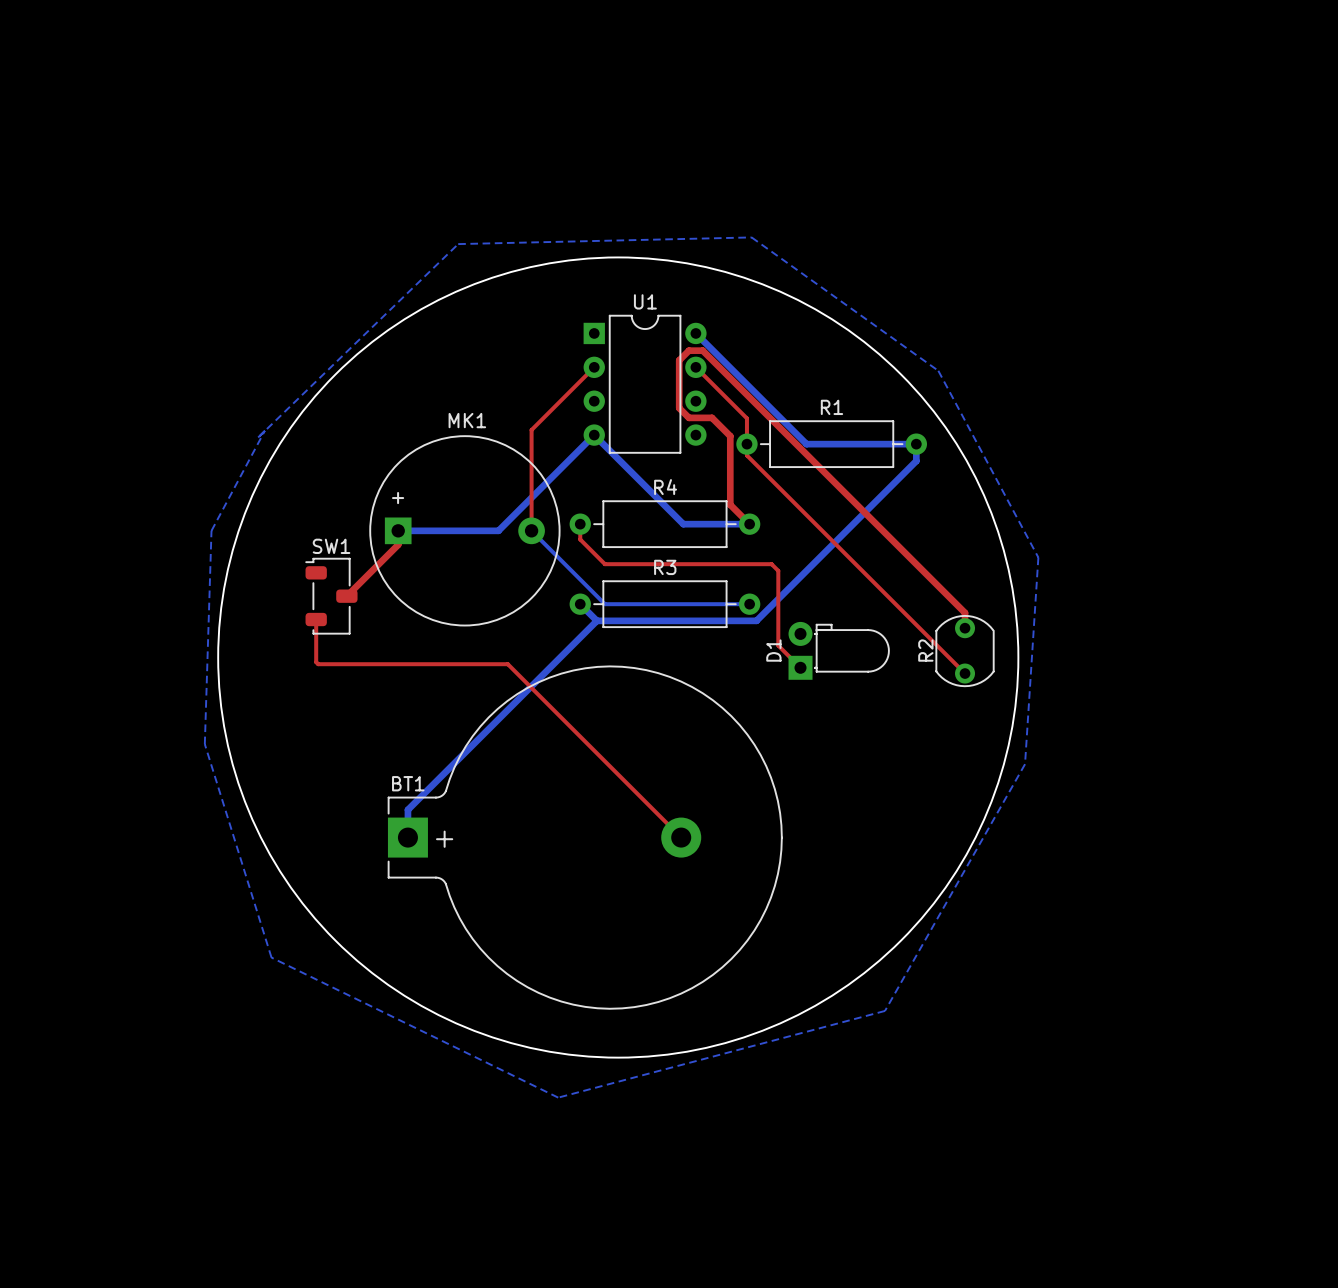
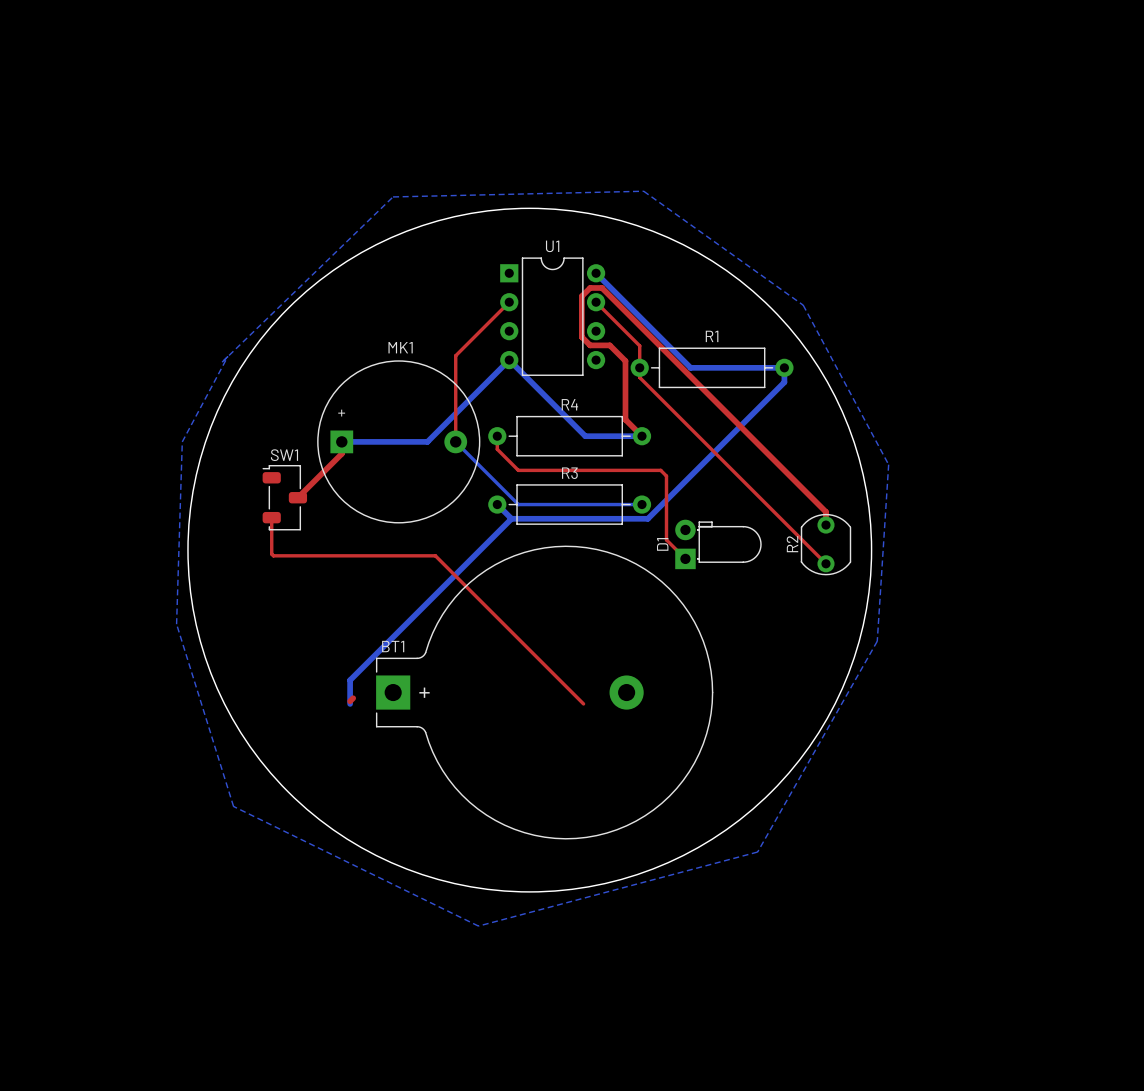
BT1 position: (585, 837) -> (544, 692)

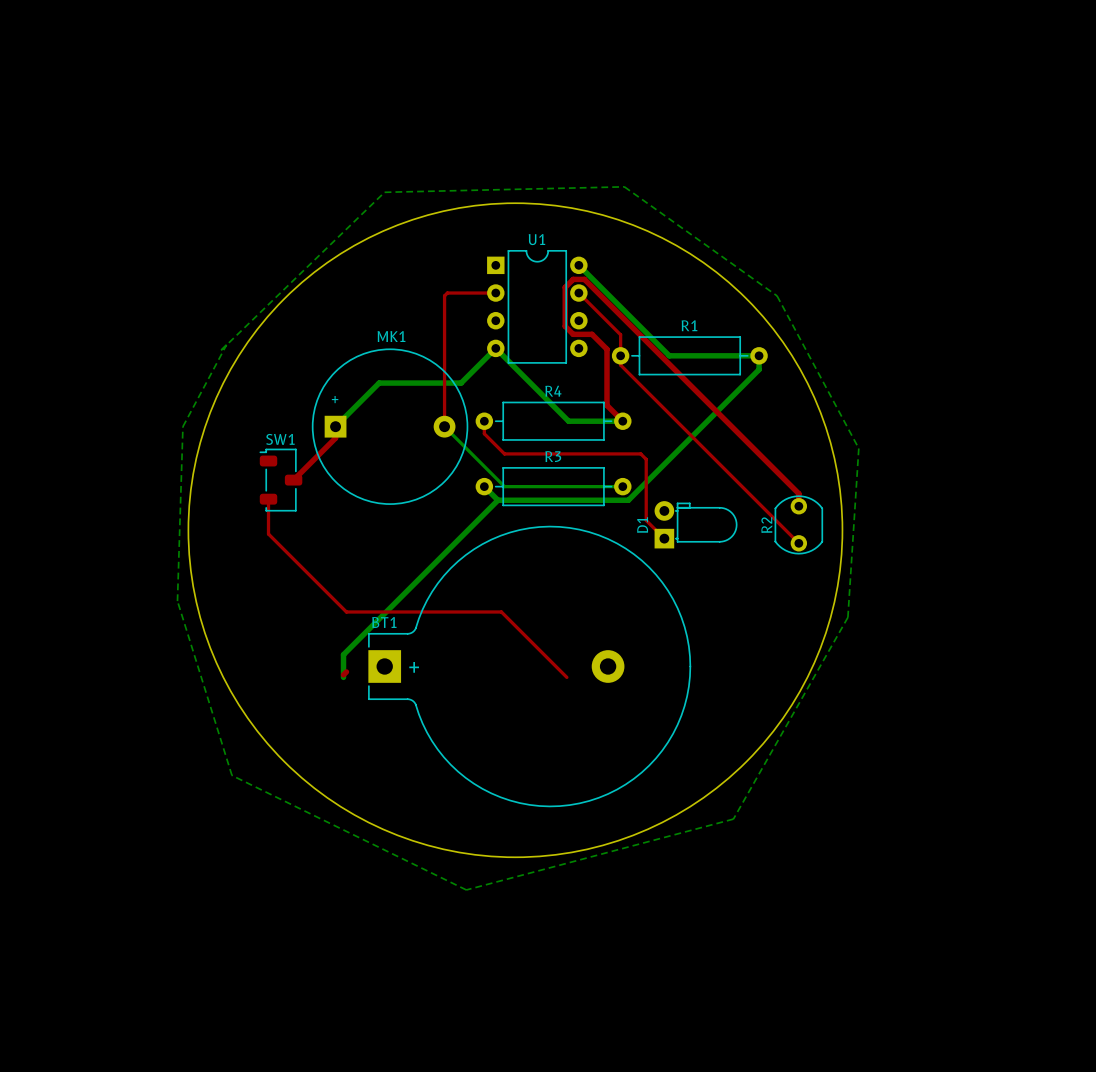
top track: (509, 302) (455, 355) -> (495, 293) (447, 293) (444, 295) (444, 344)
bottom track: (473, 396) (427, 441) (341, 441) -> (461, 383) (379, 383) (335, 426)
top track: (273, 555) (435, 555) (515, 635) -> (270, 535) (346, 611) (501, 611)

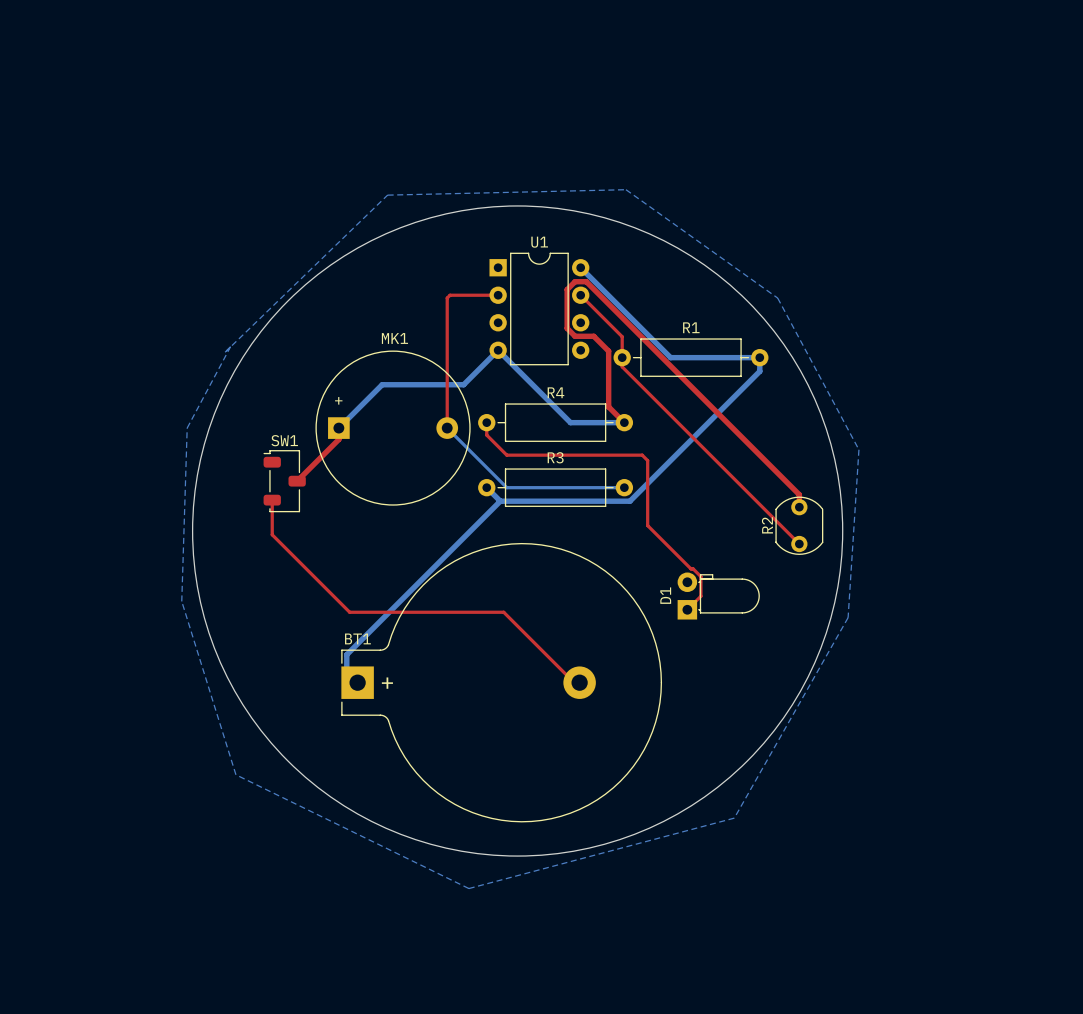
top track: (646, 520) (664, 538) -> (647, 521) (647, 525) (700, 576) (700, 596) (687, 609)
D1 position: (695, 524) -> (718, 596)
BT1 position: (529, 666) -> (501, 682)

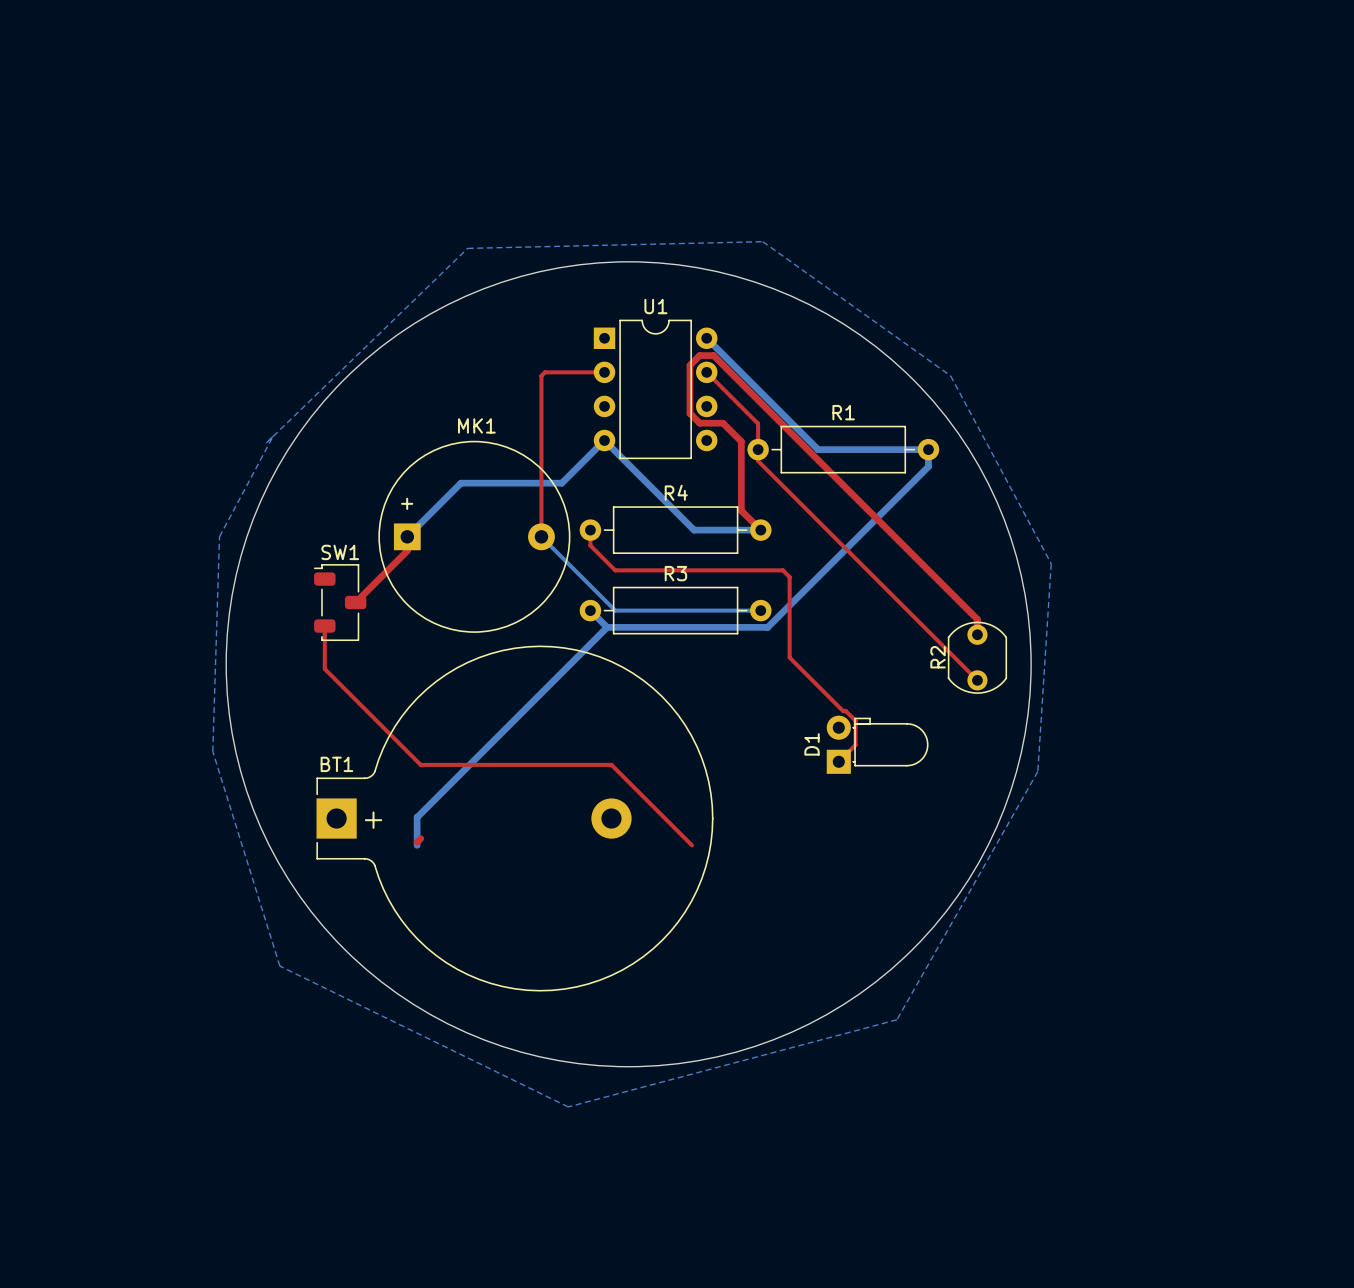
BT1 position: (501, 682) -> (514, 818)

